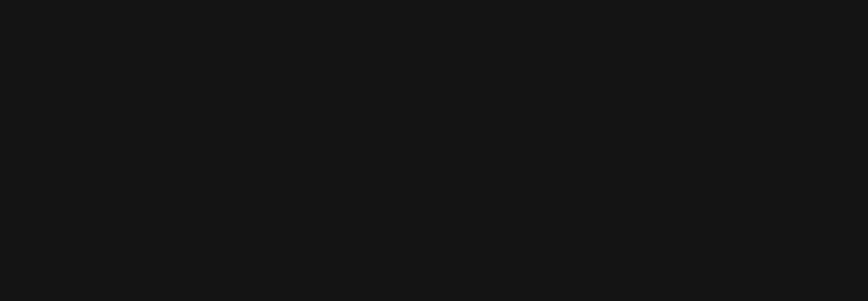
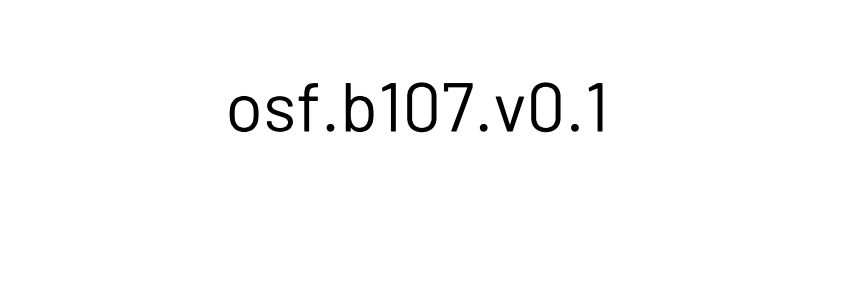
text: none -> osf.b107.v0.1 (416, 107)

